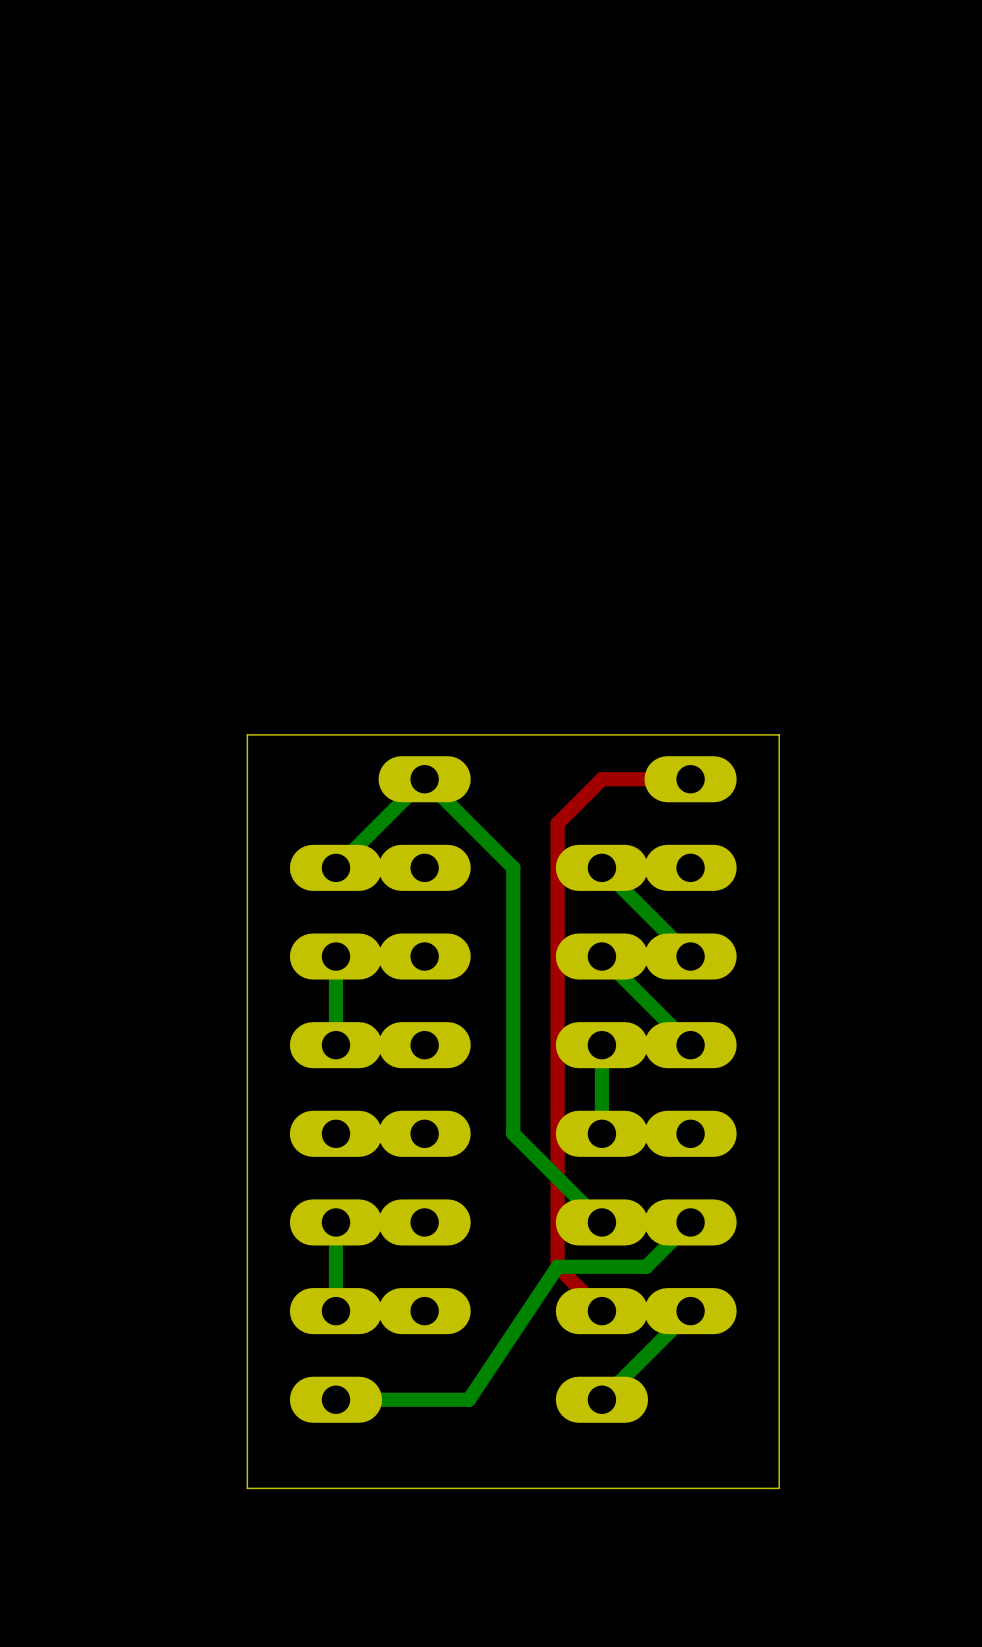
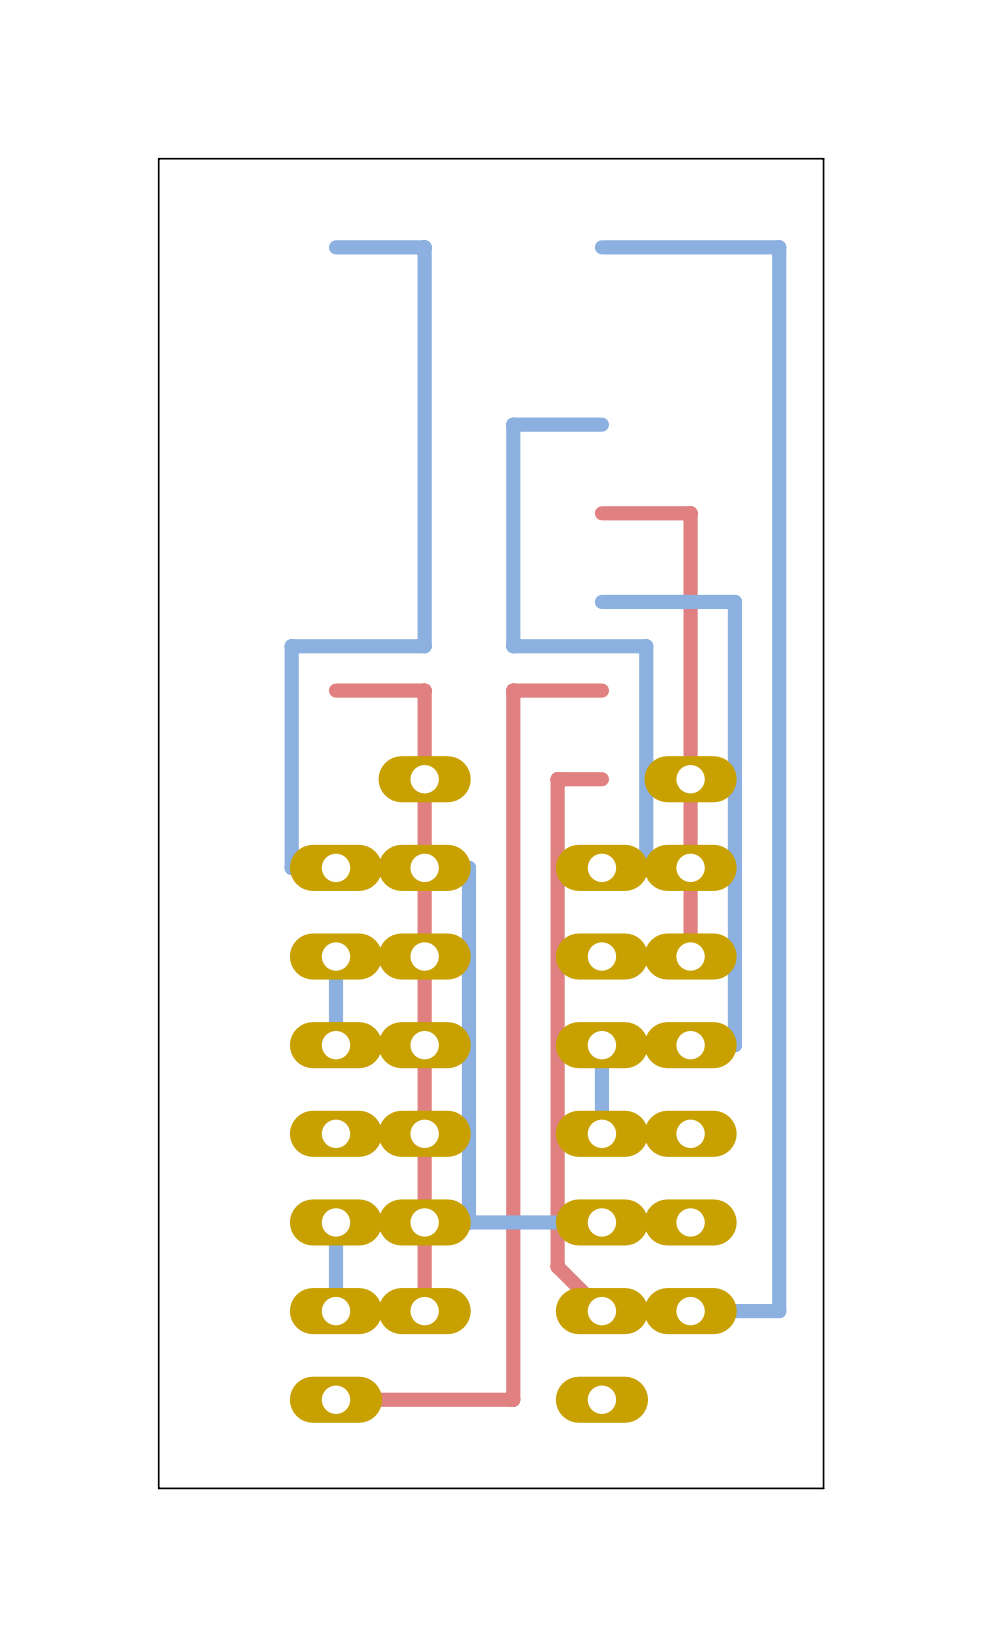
bottom track: none -> (601, 247) (779, 247) (779, 1311) (601, 1311)
top track: none -> (601, 513) (690, 513) (690, 956) (601, 956)
bottom track: none -> (601, 601) (734, 601) (734, 1045) (601, 1045)
top track: none -> (335, 690) (424, 690) (424, 1311) (335, 1311)
top track: none -> (601, 690) (513, 690) (513, 1399) (335, 1399)
top track: (690, 779) (601, 779) (557, 823) -> (601, 779) (557, 779) (557, 823)
bottom track: (335, 867) (424, 779) (513, 867) (513, 1133) (601, 1222) -> (335, 247) (424, 247) (424, 646) (291, 646) (291, 867) (468, 867) (468, 1222) (601, 1222)
bottom track: (601, 867) (690, 956) -> (601, 867) (646, 867) (646, 646) (513, 646) (513, 424) (601, 424)
bottom track: (601, 956) (690, 1045) -> none
bottom track: (690, 1222) (646, 1266) (557, 1266) (468, 1399) (335, 1399) -> none
bottom track: (690, 1311) (601, 1399) -> none
board edge: (779, 1488) (779, 734) (247, 734) (247, 1488) -> (779, 1488) (823, 1488) (823, 158) (158, 158) (158, 1488) (247, 1488)

